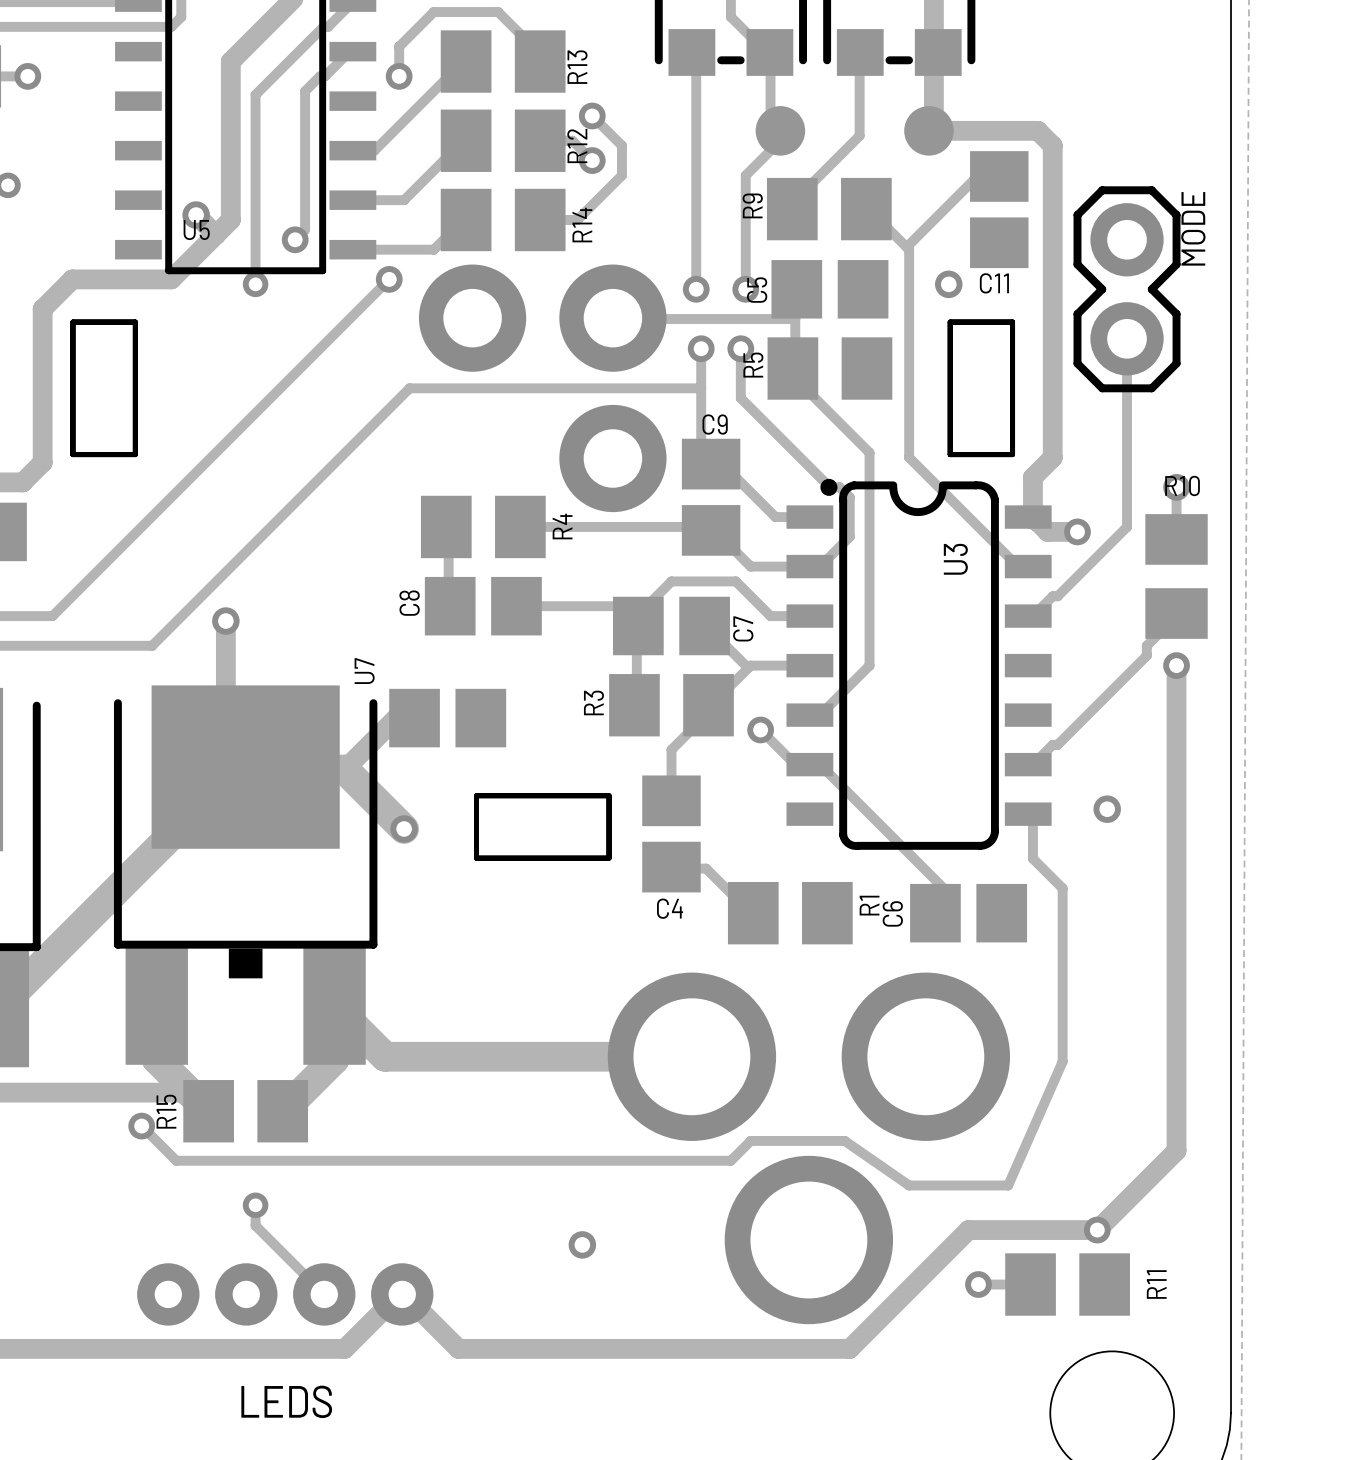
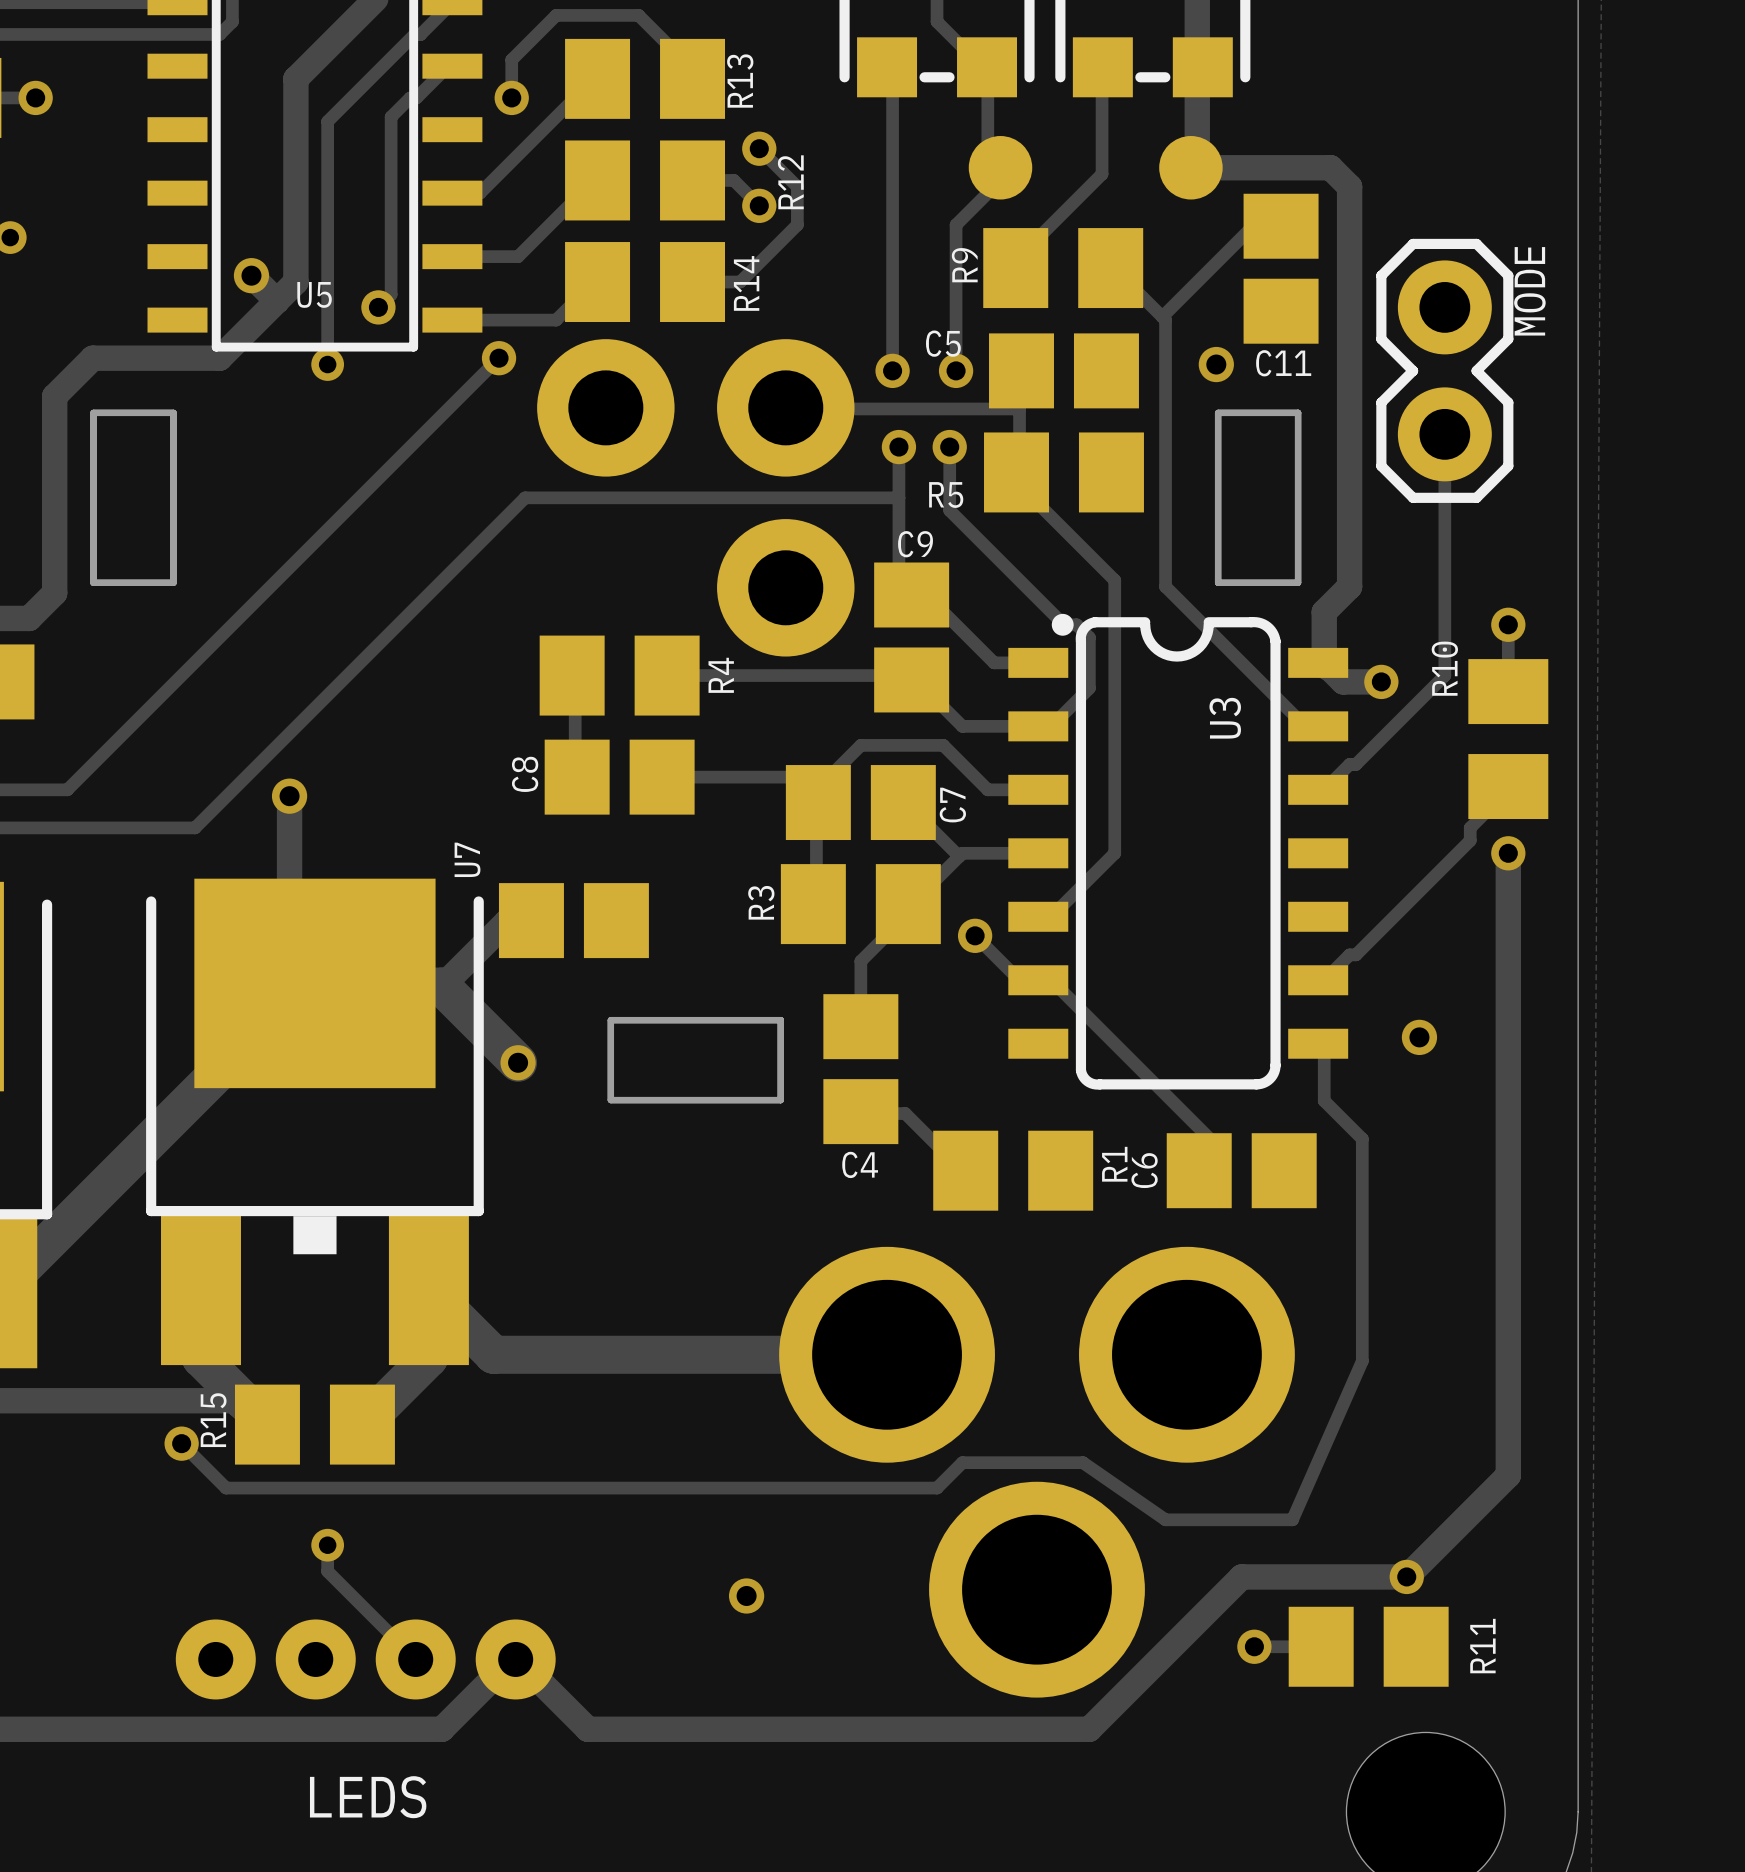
R12 name position: R12 (577, 145) -> R12 (790, 182)
U5 name position: U5 (196, 229) -> U5 (314, 294)
C5 name rotation: 0° (757, 290) -> 90° clockwise (943, 343)
R5 name rotation: 0° (753, 365) -> 90° clockwise (946, 495)
R10 name rotation: 0° (1182, 485) -> 90° counterclockwise (1444, 668)

